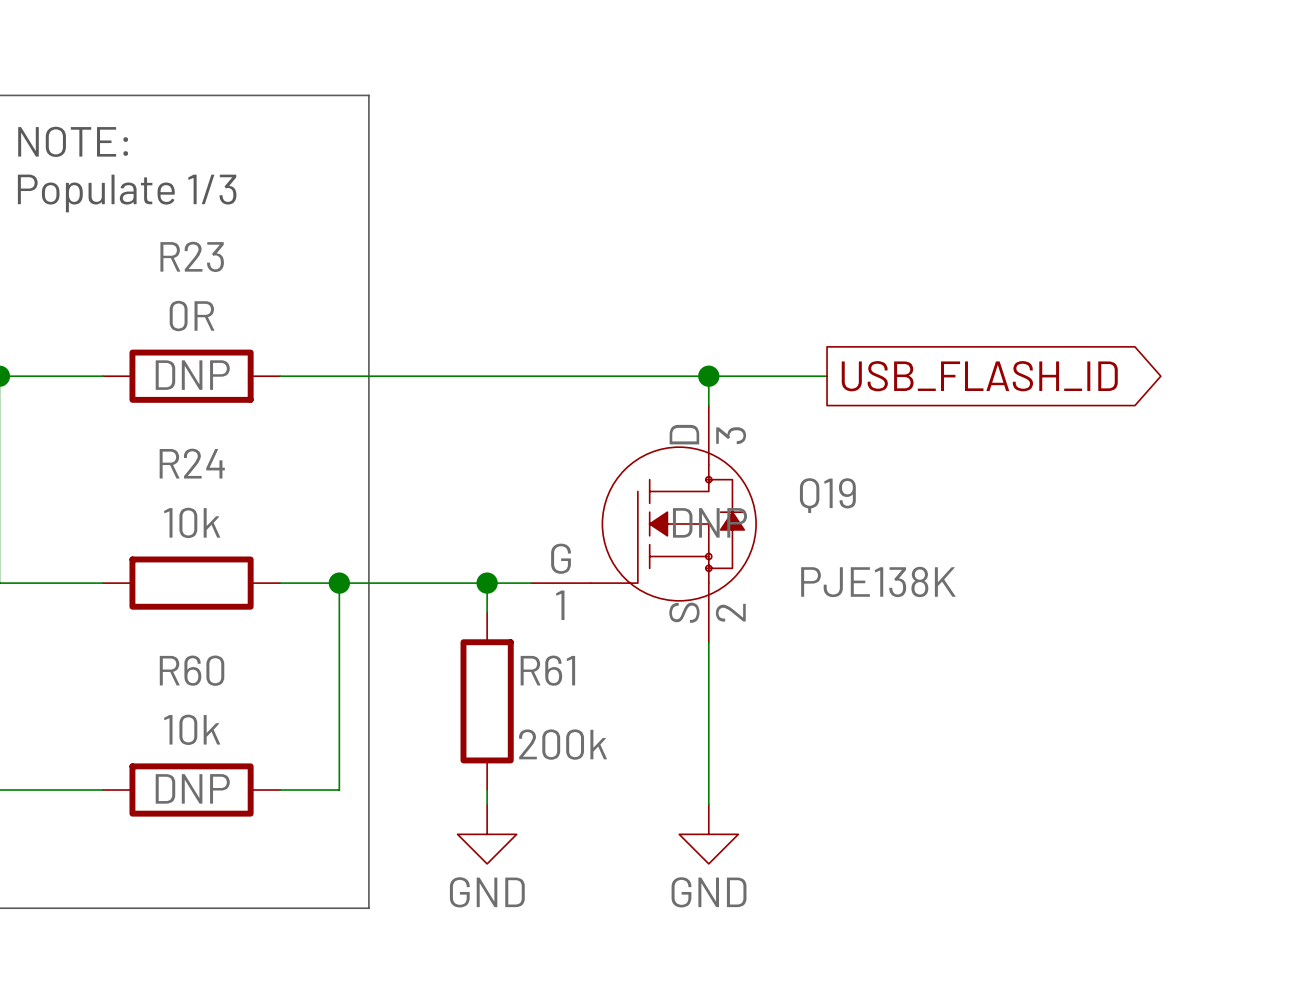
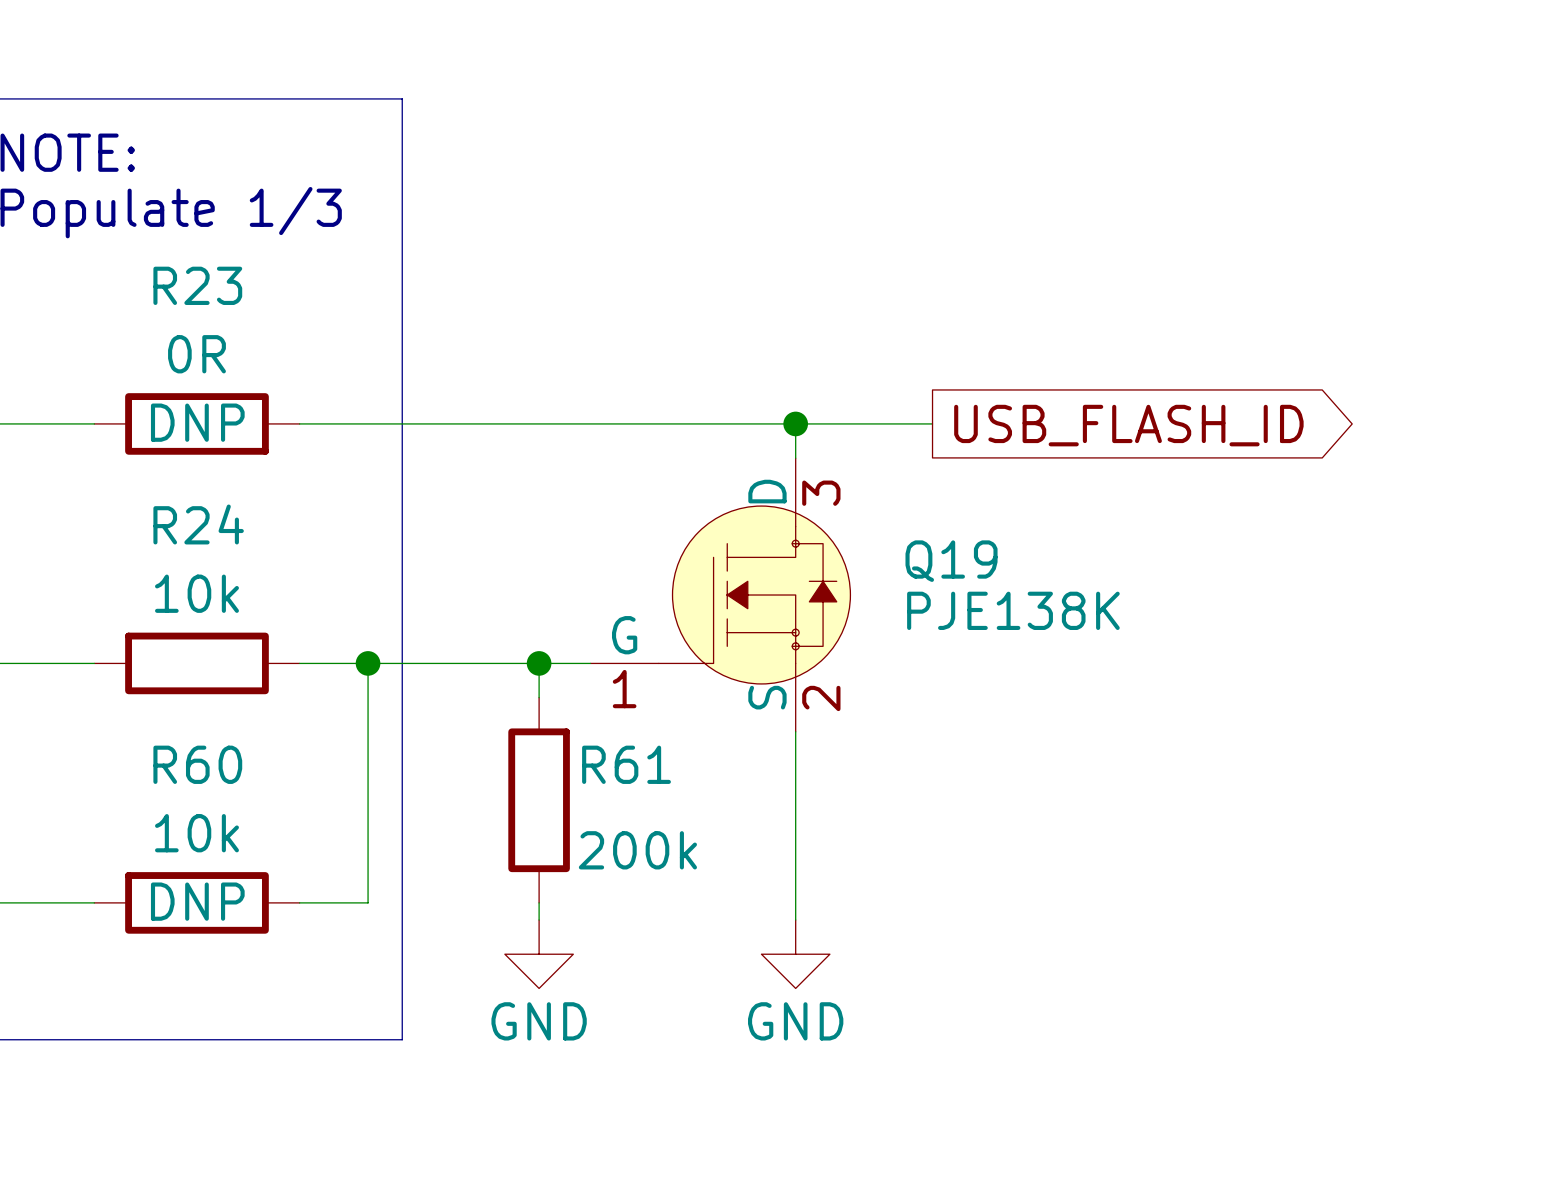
Q19 text: DNP (710, 522) -> none
Q19 value position: PJE138K (878, 581) -> PJE138K (1013, 610)

